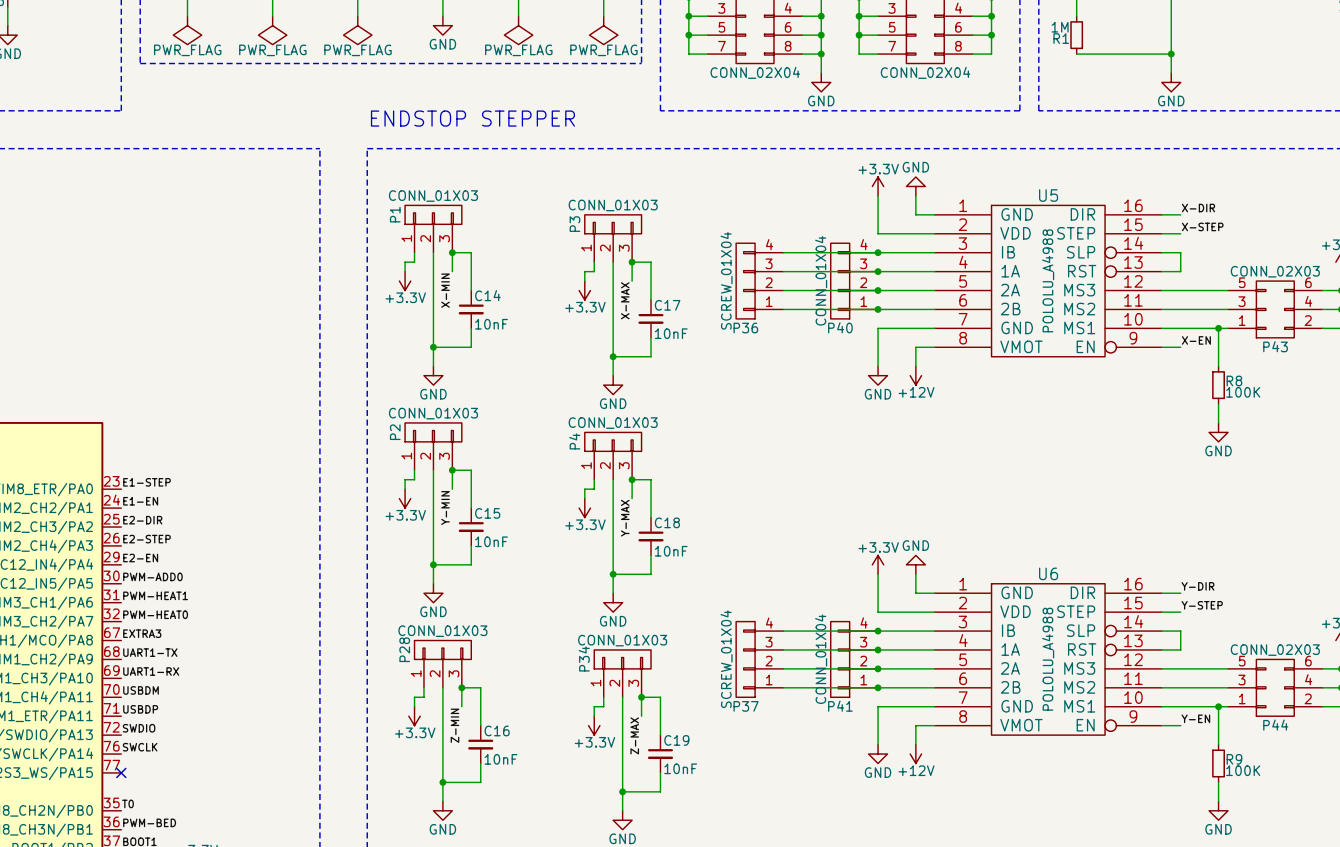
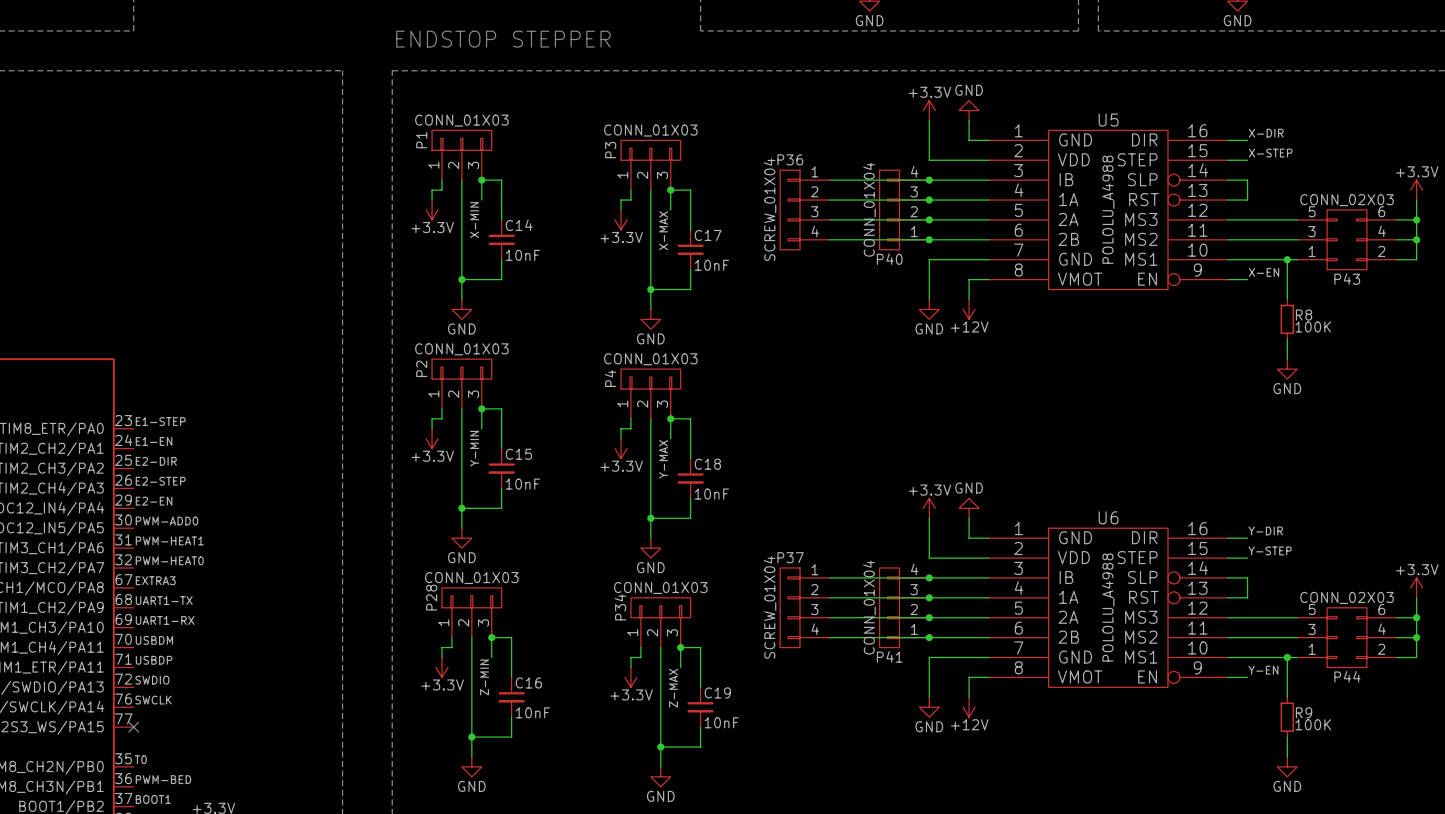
P36 flip: as is (745, 281) -> up-down (790, 209)
P37 flip: as is (745, 659) -> up-down (790, 607)

